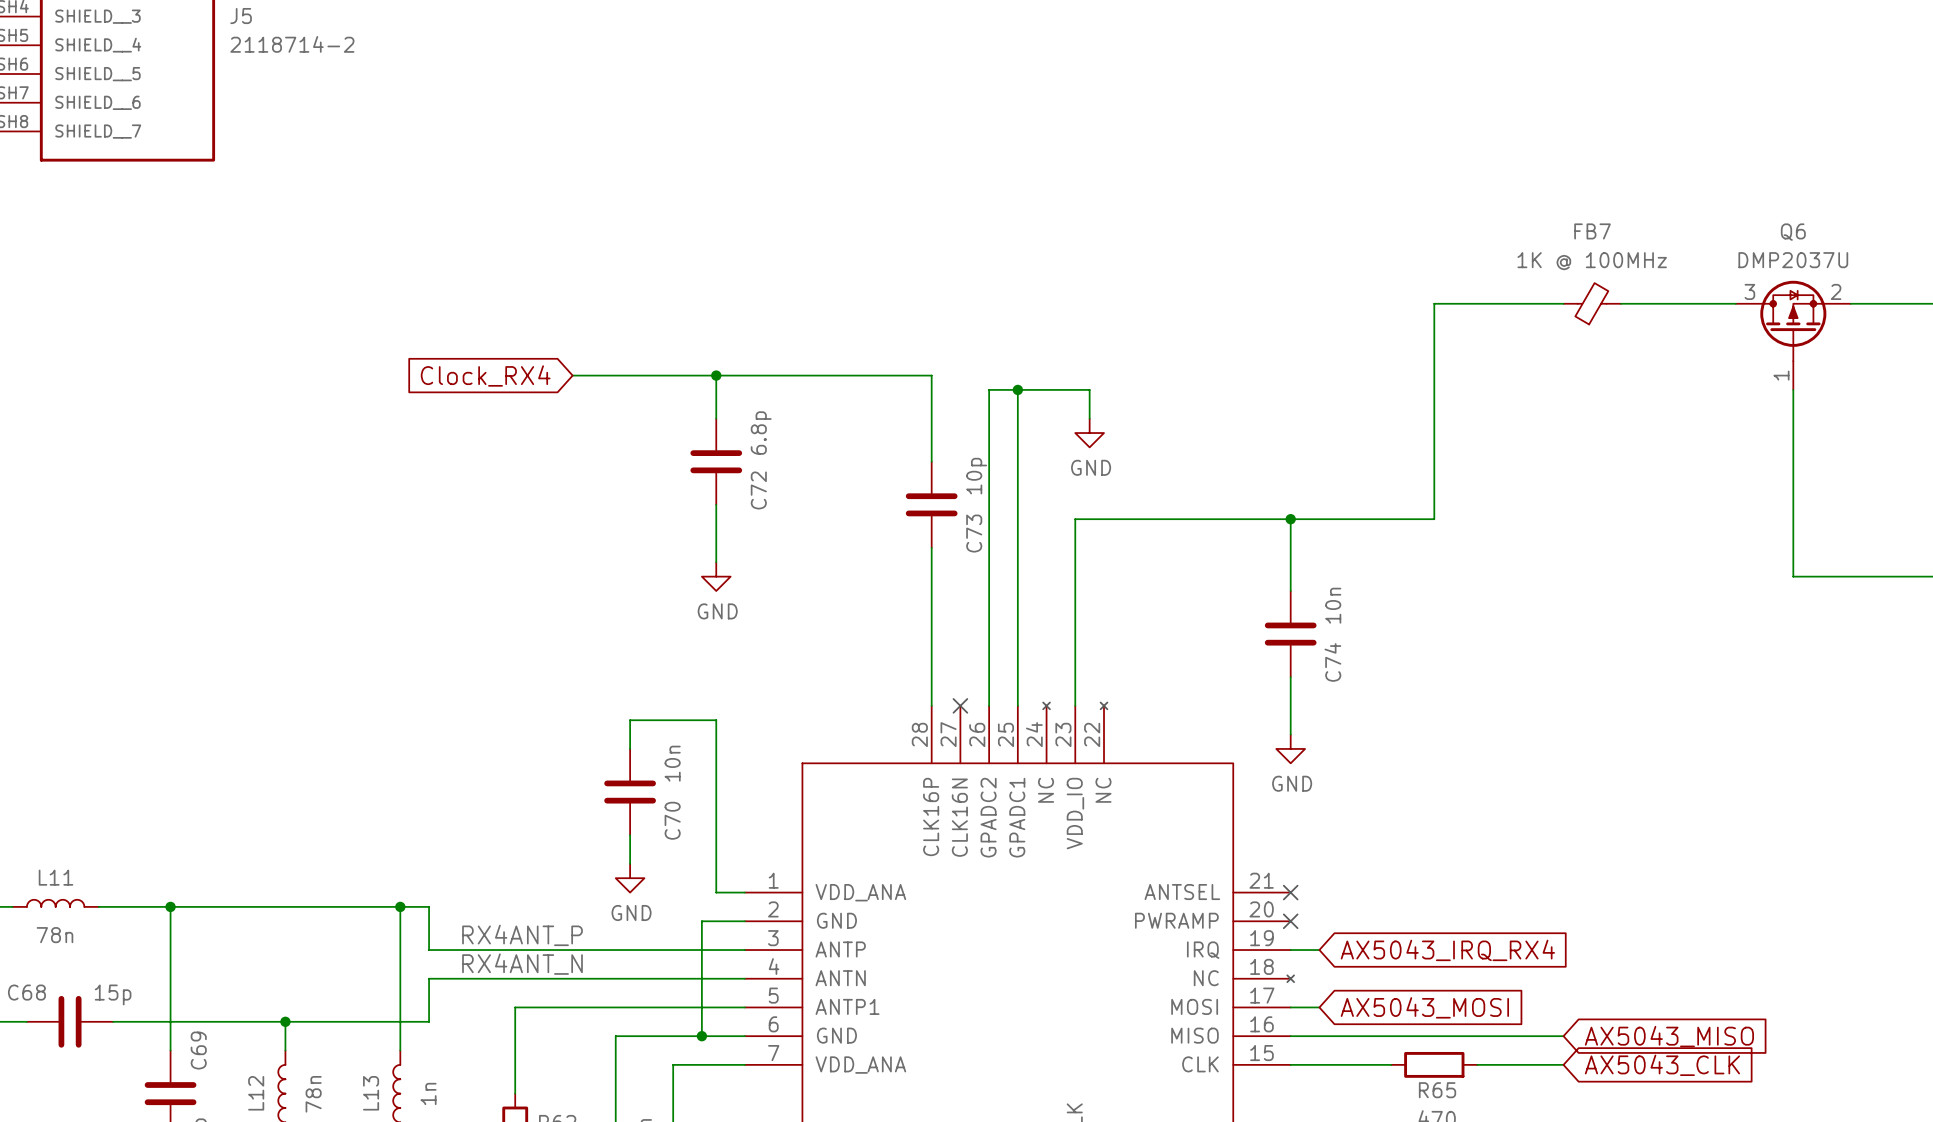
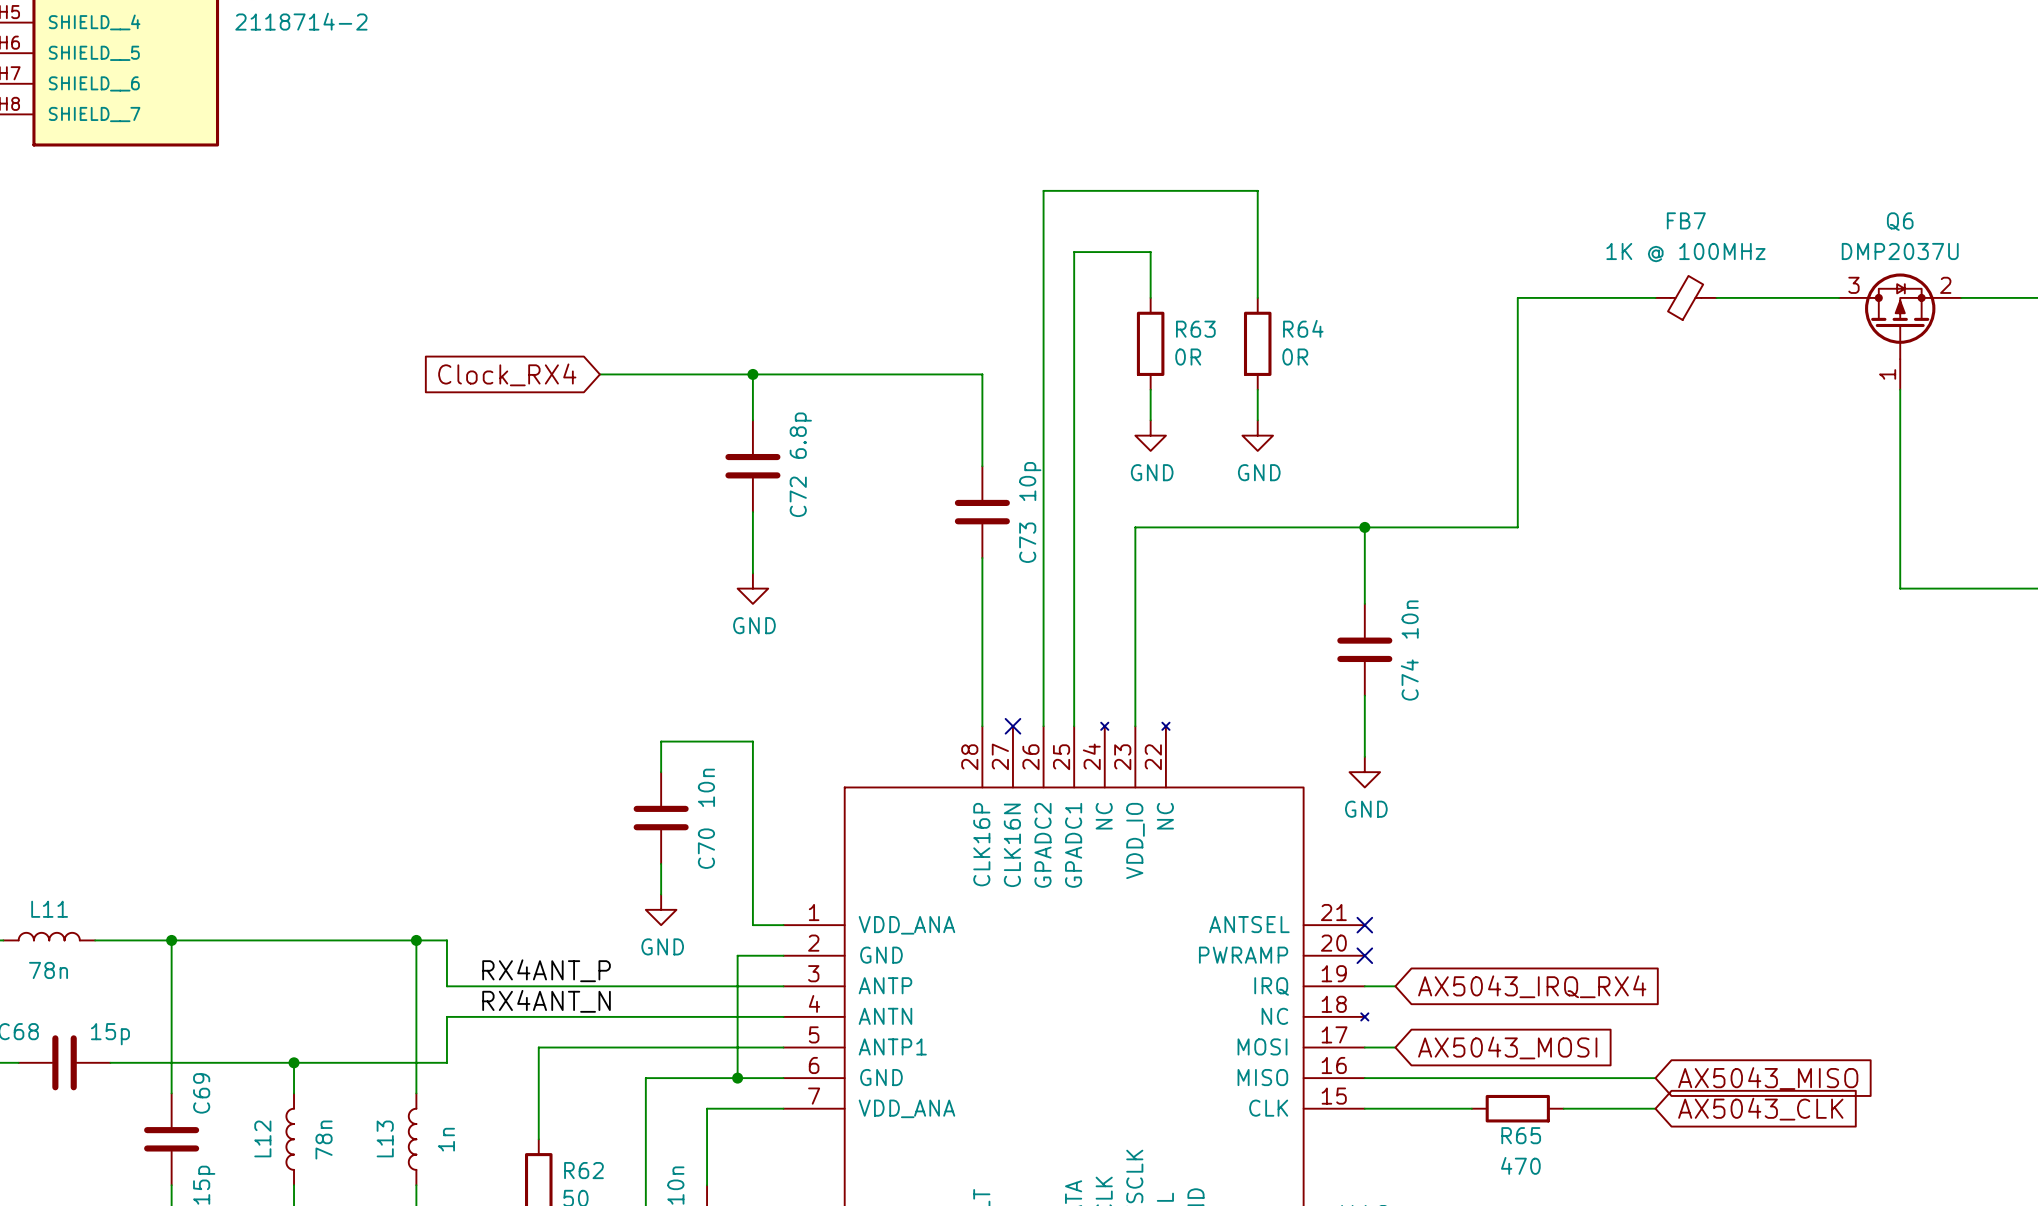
wire: none -> (1150, 297) (1150, 252) (1074, 252) (1074, 389)
R63: none -> 0R (1150, 343)
R64: none -> 0R (1257, 343)
wire: (989, 389) (1089, 389) -> (1043, 389) (1043, 190) (1257, 190) (1257, 297)
junction: (1017, 389) -> none
wire: none -> (1257, 389) (1257, 420)
power symbol: none -> GND (1257, 435)

